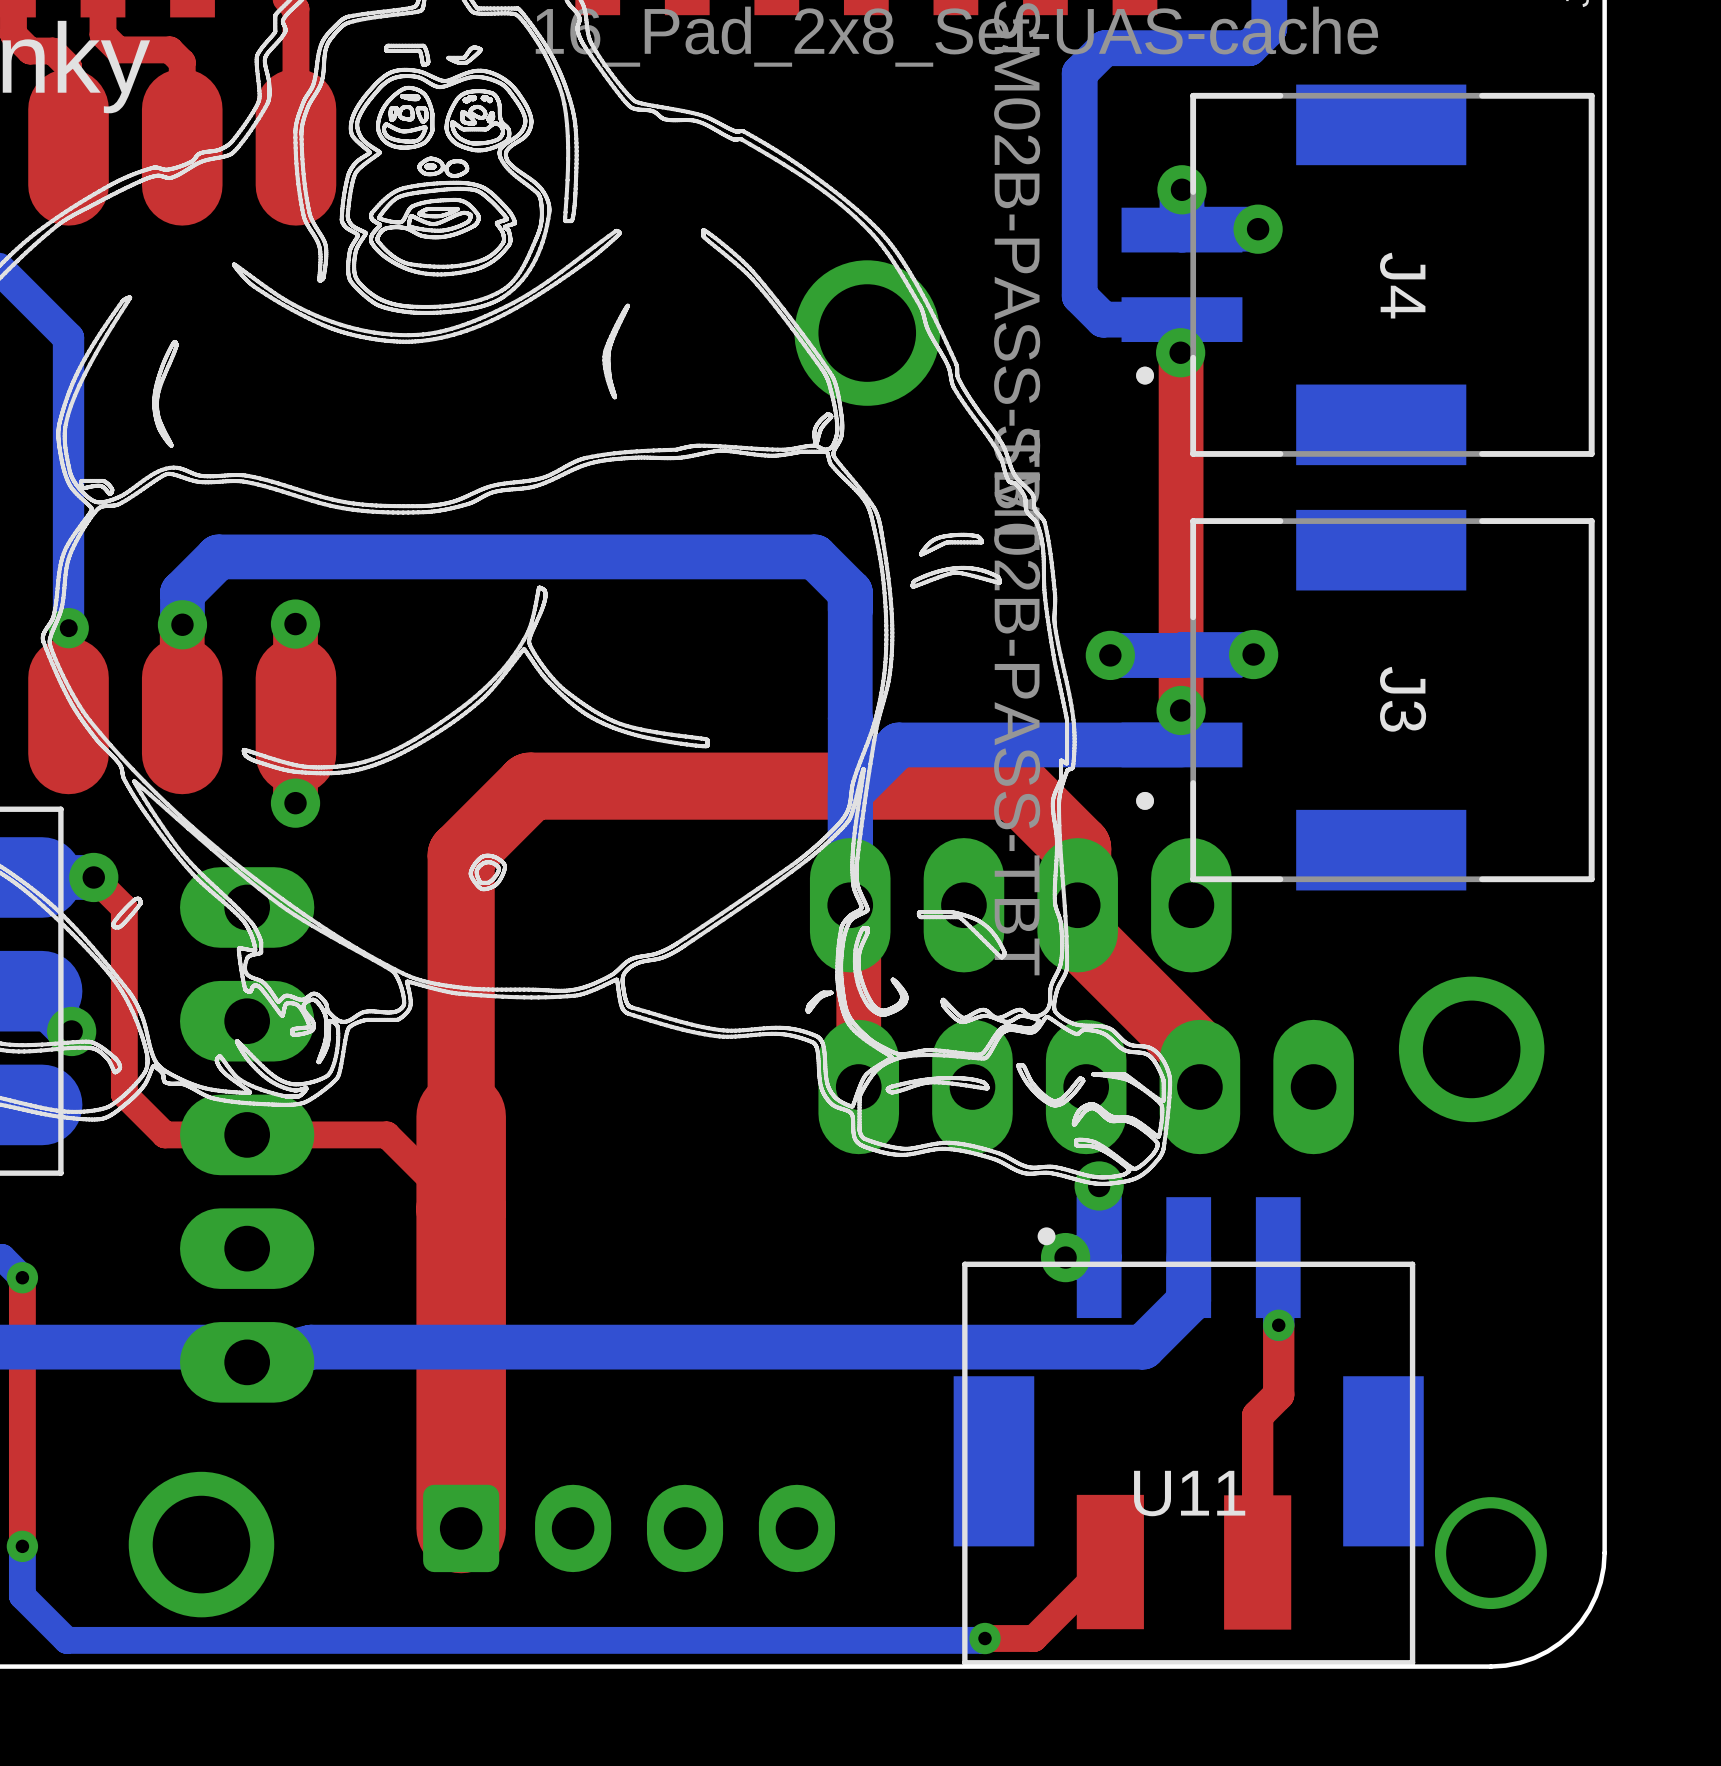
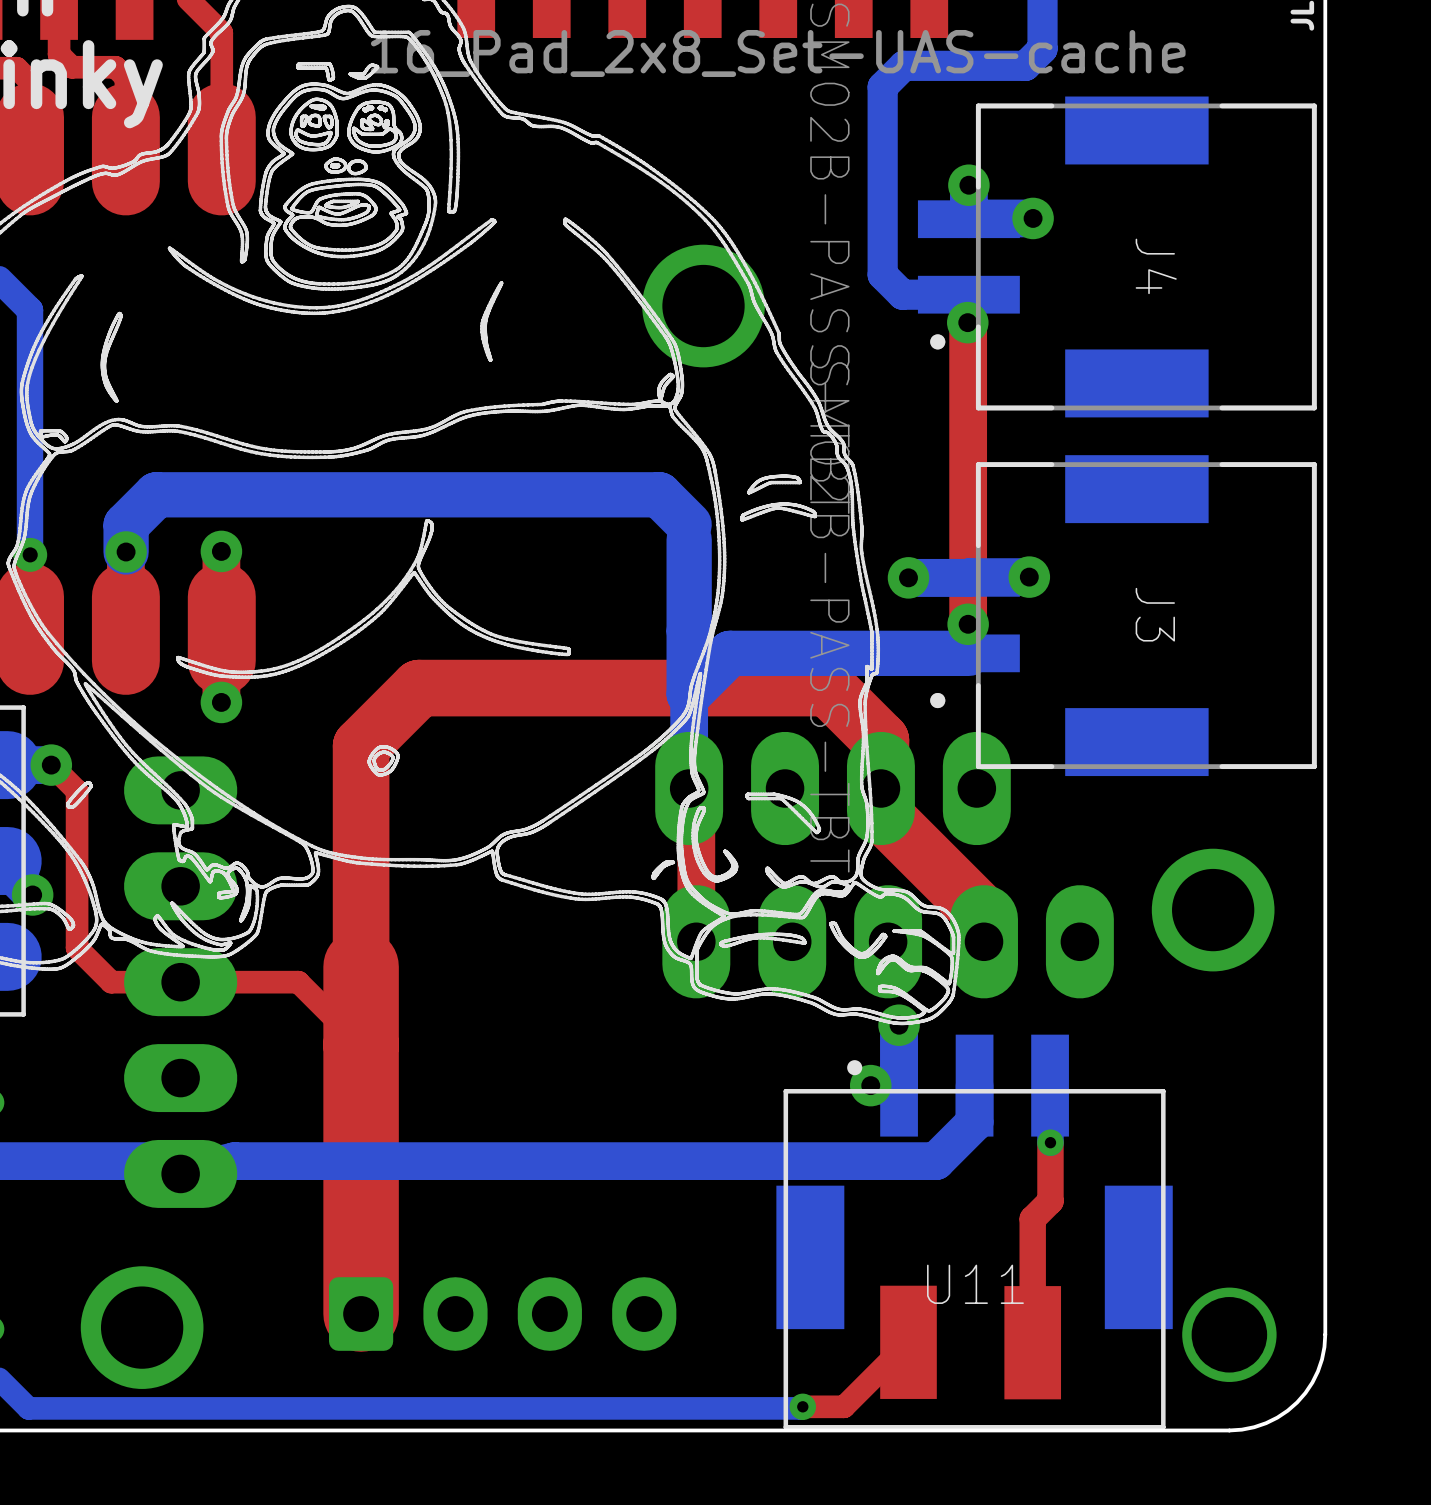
bottom track width: thin (850, 592) (814, 556) (218, 556) (182, 592) (182, 624) -> thick (689, 524) (659, 494) (156, 494) (126, 525) (126, 552)
bottom track width: thin (850, 610) (850, 793) (898, 744) (1181, 744) -> thick (689, 539) (689, 694) (729, 653) (968, 653)

